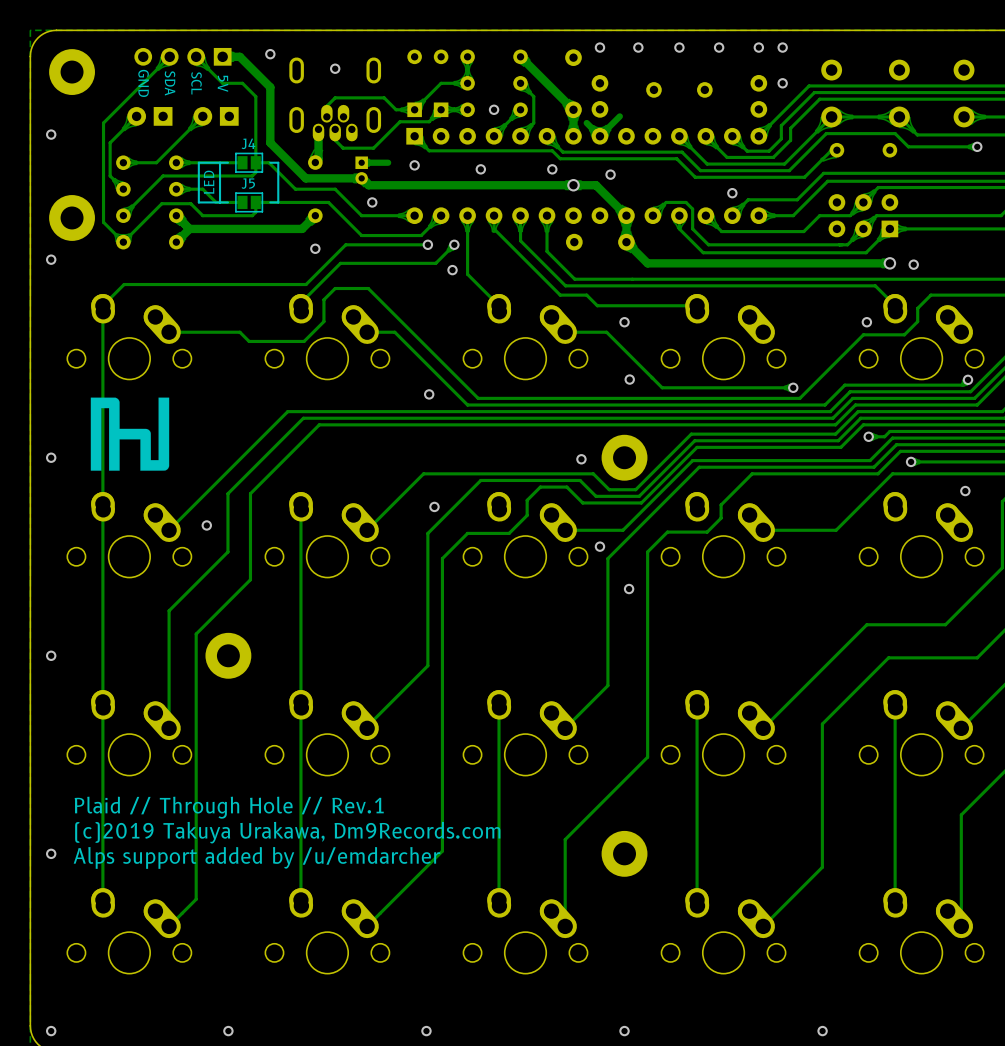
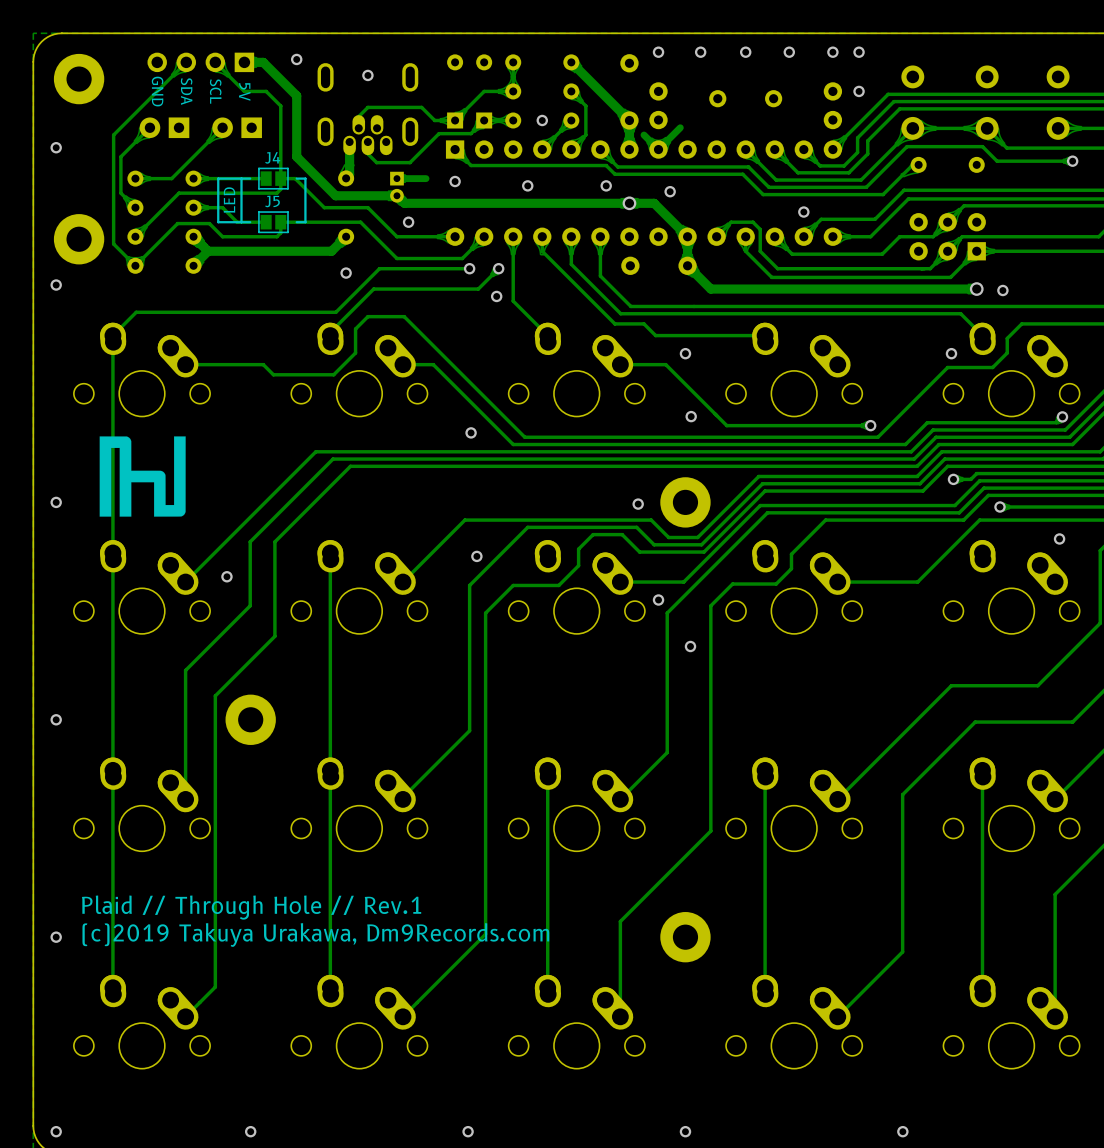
text: Plaid // Through Hole // Rev.1 (229, 807) -> none
text: (c)2019 Takuya Urakawa, Dm9Records.com (287, 832) -> Plaid // Through Hole // Rev.1 (251, 907)
text: Alps support added by /u/emdarcher (257, 857) -> (c)2019 Takuya Urakawa, Dm9Records.com (315, 934)

